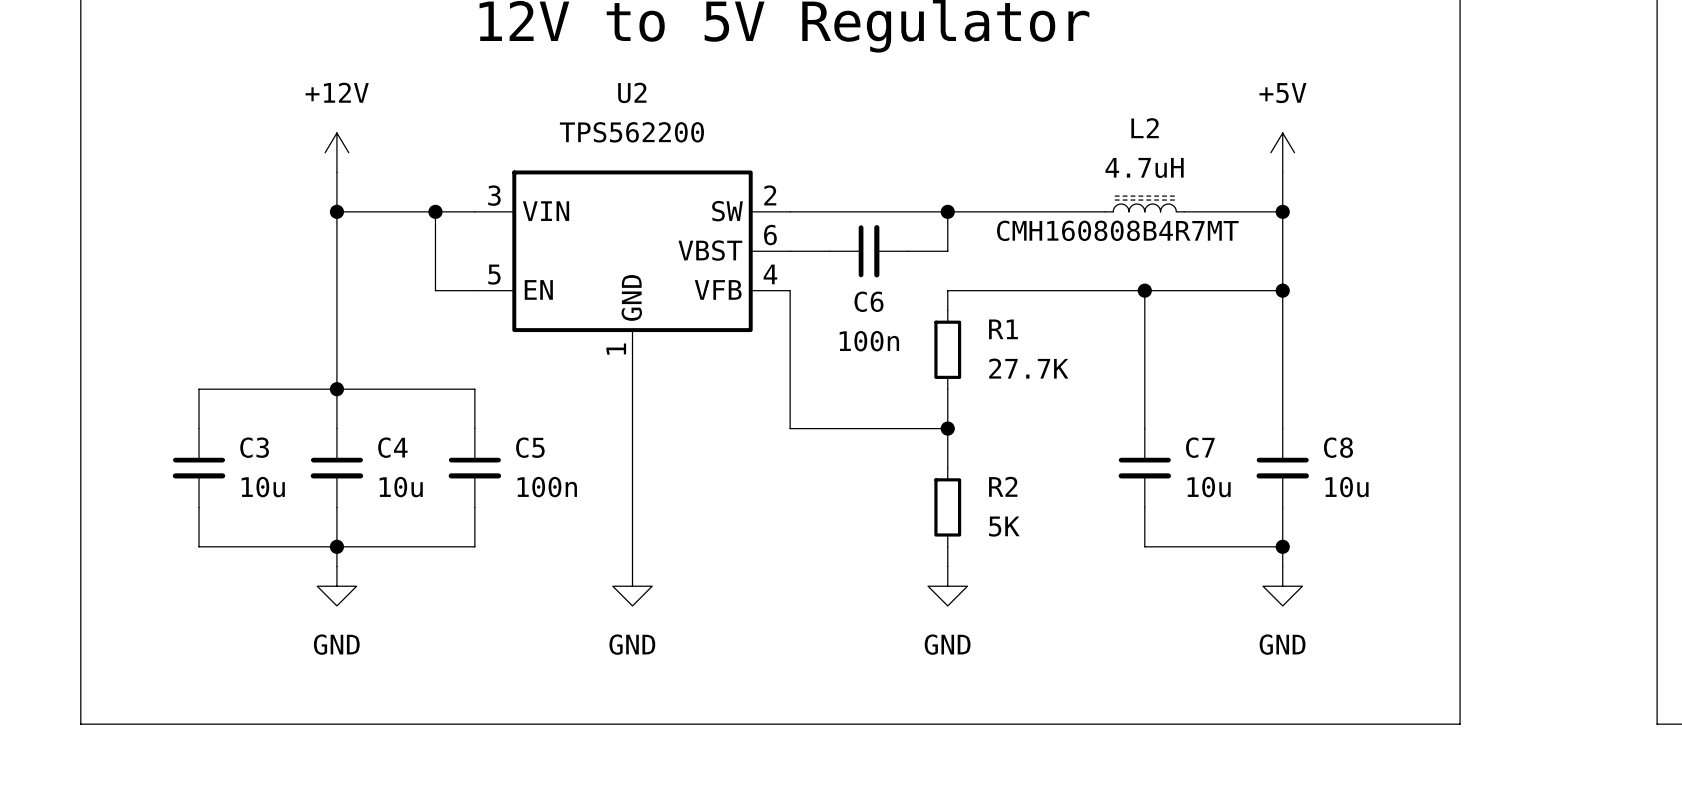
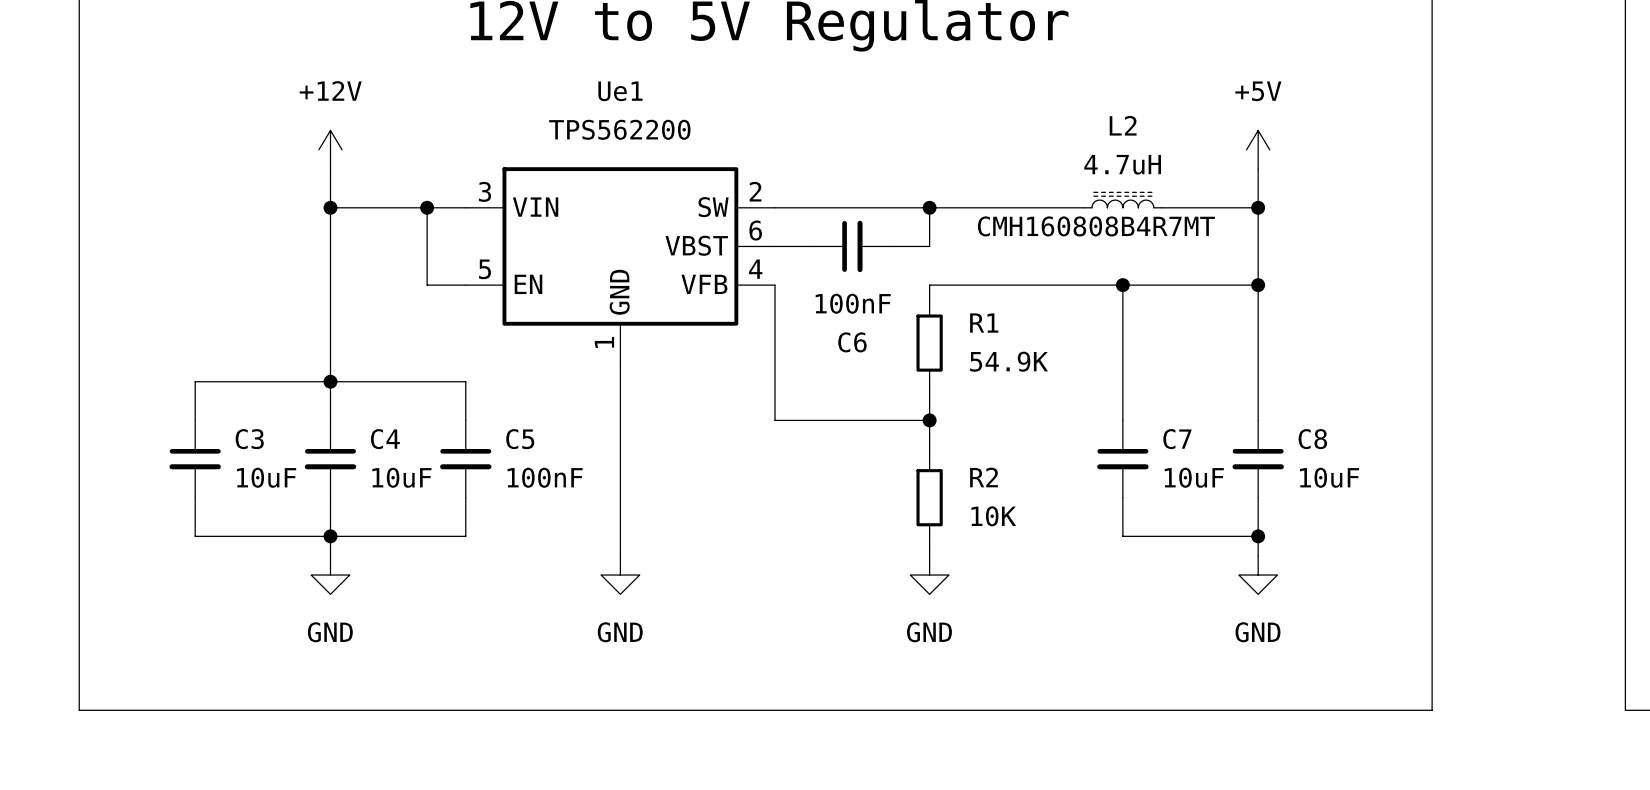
U2 name: U2 (632, 92) -> Ue1 (620, 91)
C6 name position: C6 (868, 301) -> C6 (852, 342)
C6 value: 100n (869, 341) -> 100nF (853, 303)
R1 value: 27.7K (1028, 368) -> 54.9K (1009, 361)
C3 value: 10u (263, 487) -> 10uF (266, 477)
C4 value: 10u (401, 487) -> 10uF (401, 477)
C5 value: 100n (547, 487) -> 100nF (545, 477)
C7 value: 10u (1209, 487) -> 10uF (1194, 477)
C8 value: 10u (1346, 487) -> 10uF (1329, 477)
R2 value: 5K (1004, 526) -> 10K (993, 516)

